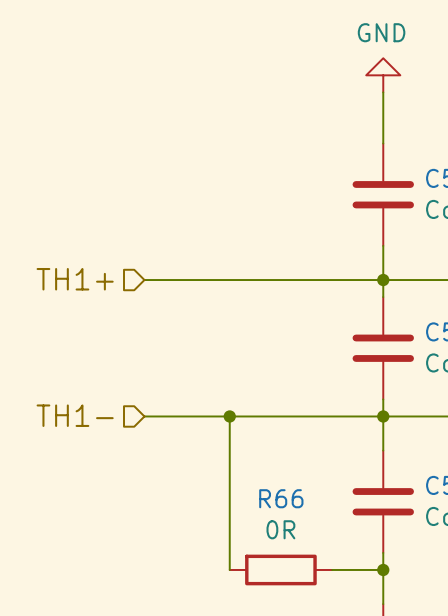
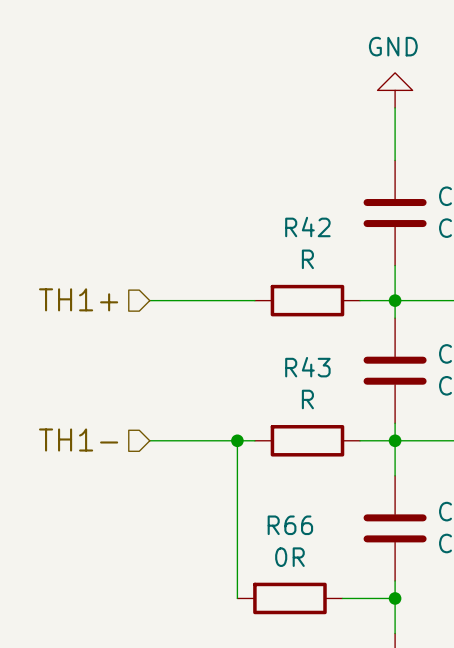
wire: (246, 280) (349, 280) -> none
R42: none -> R (307, 300)
wire: (246, 416) (349, 416) -> none
R43: none -> R (307, 440)

